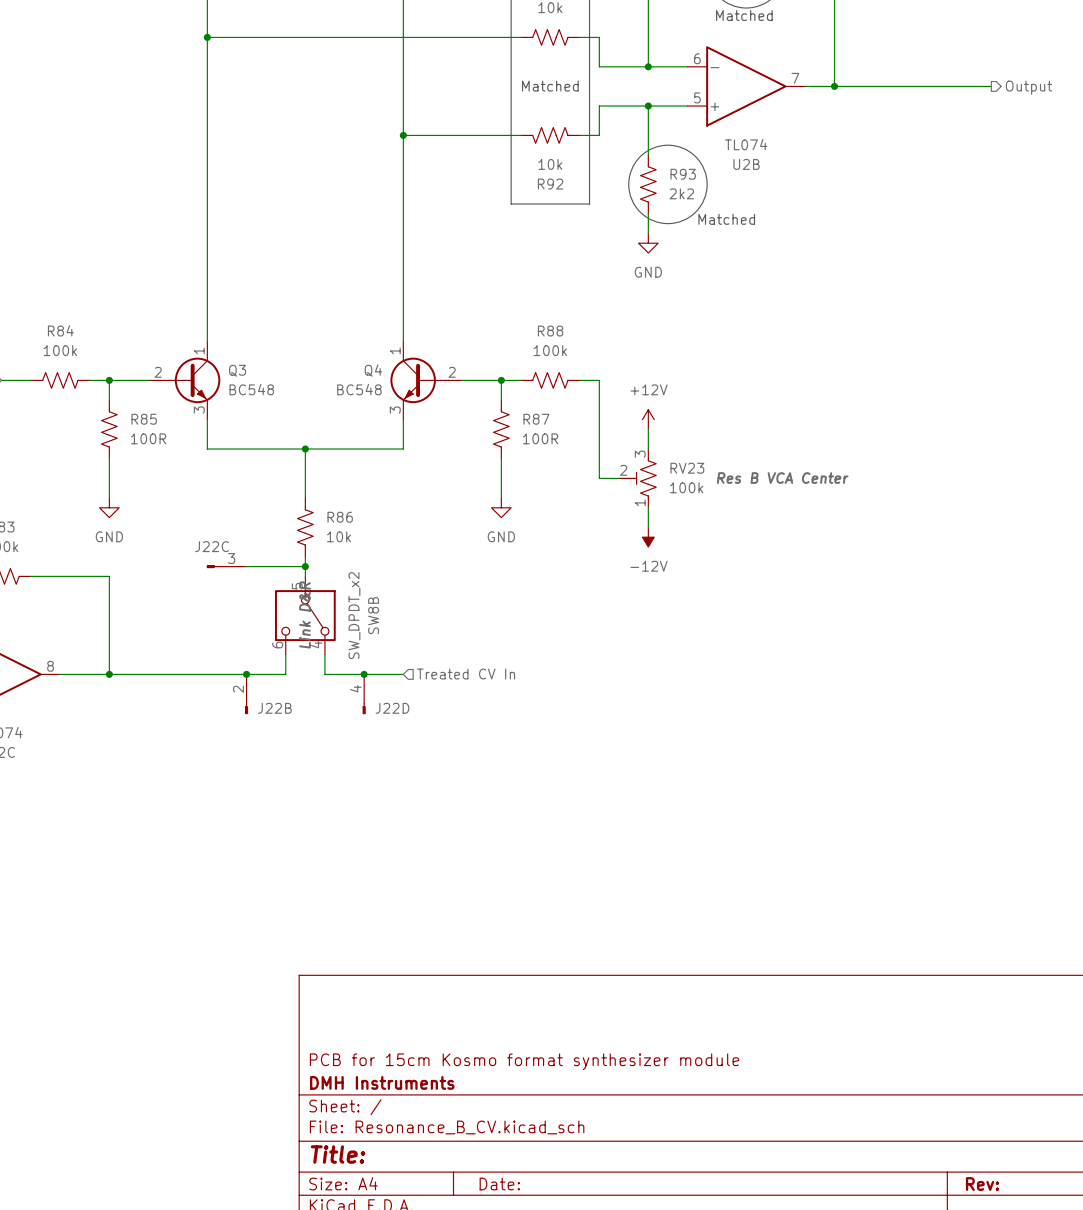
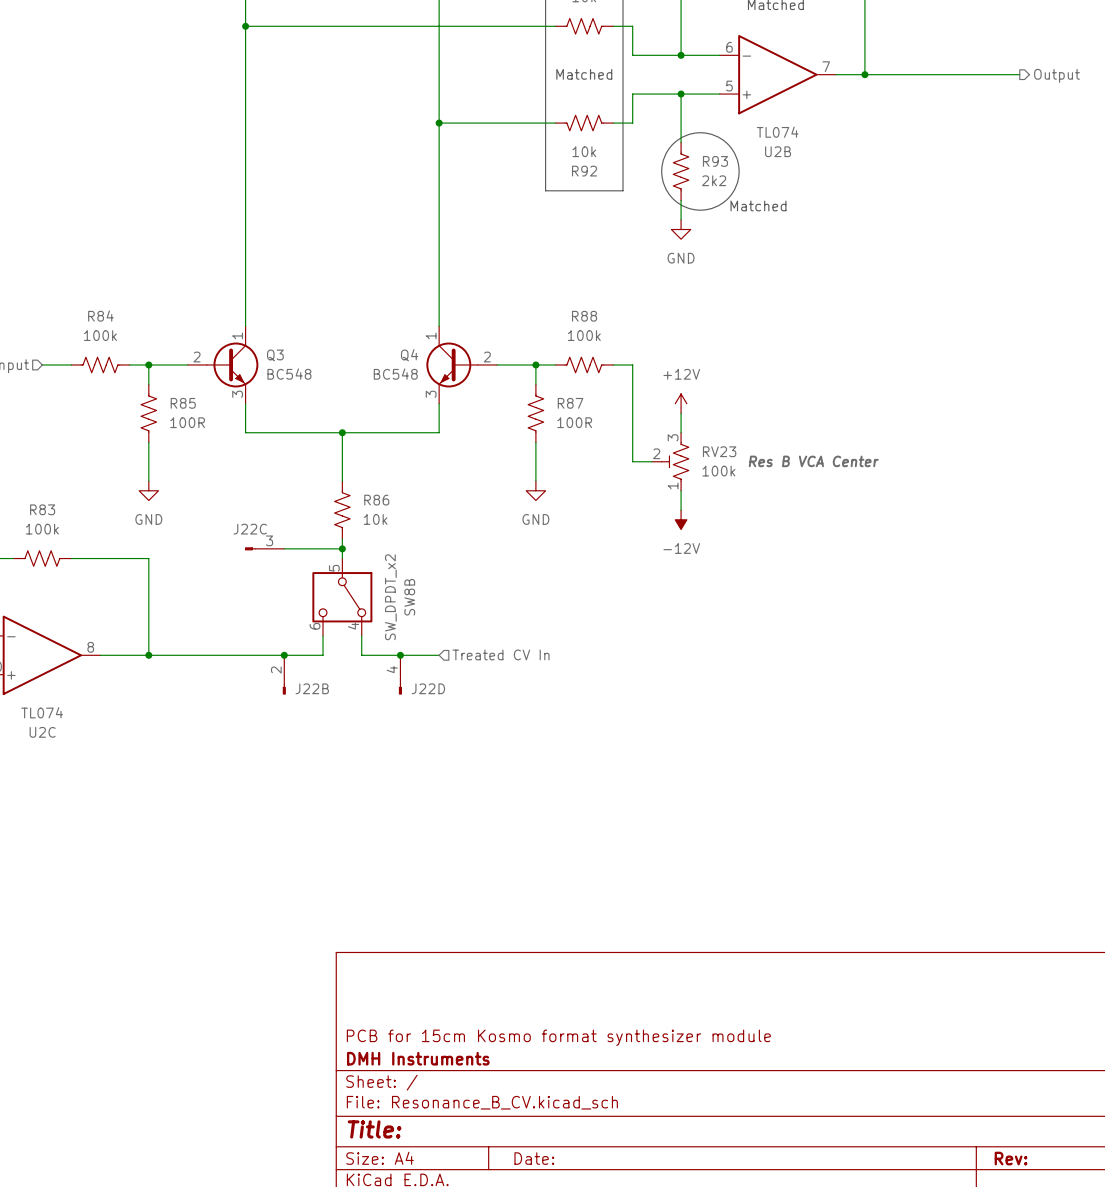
SW8B text: Link D&R (304, 614) -> none

